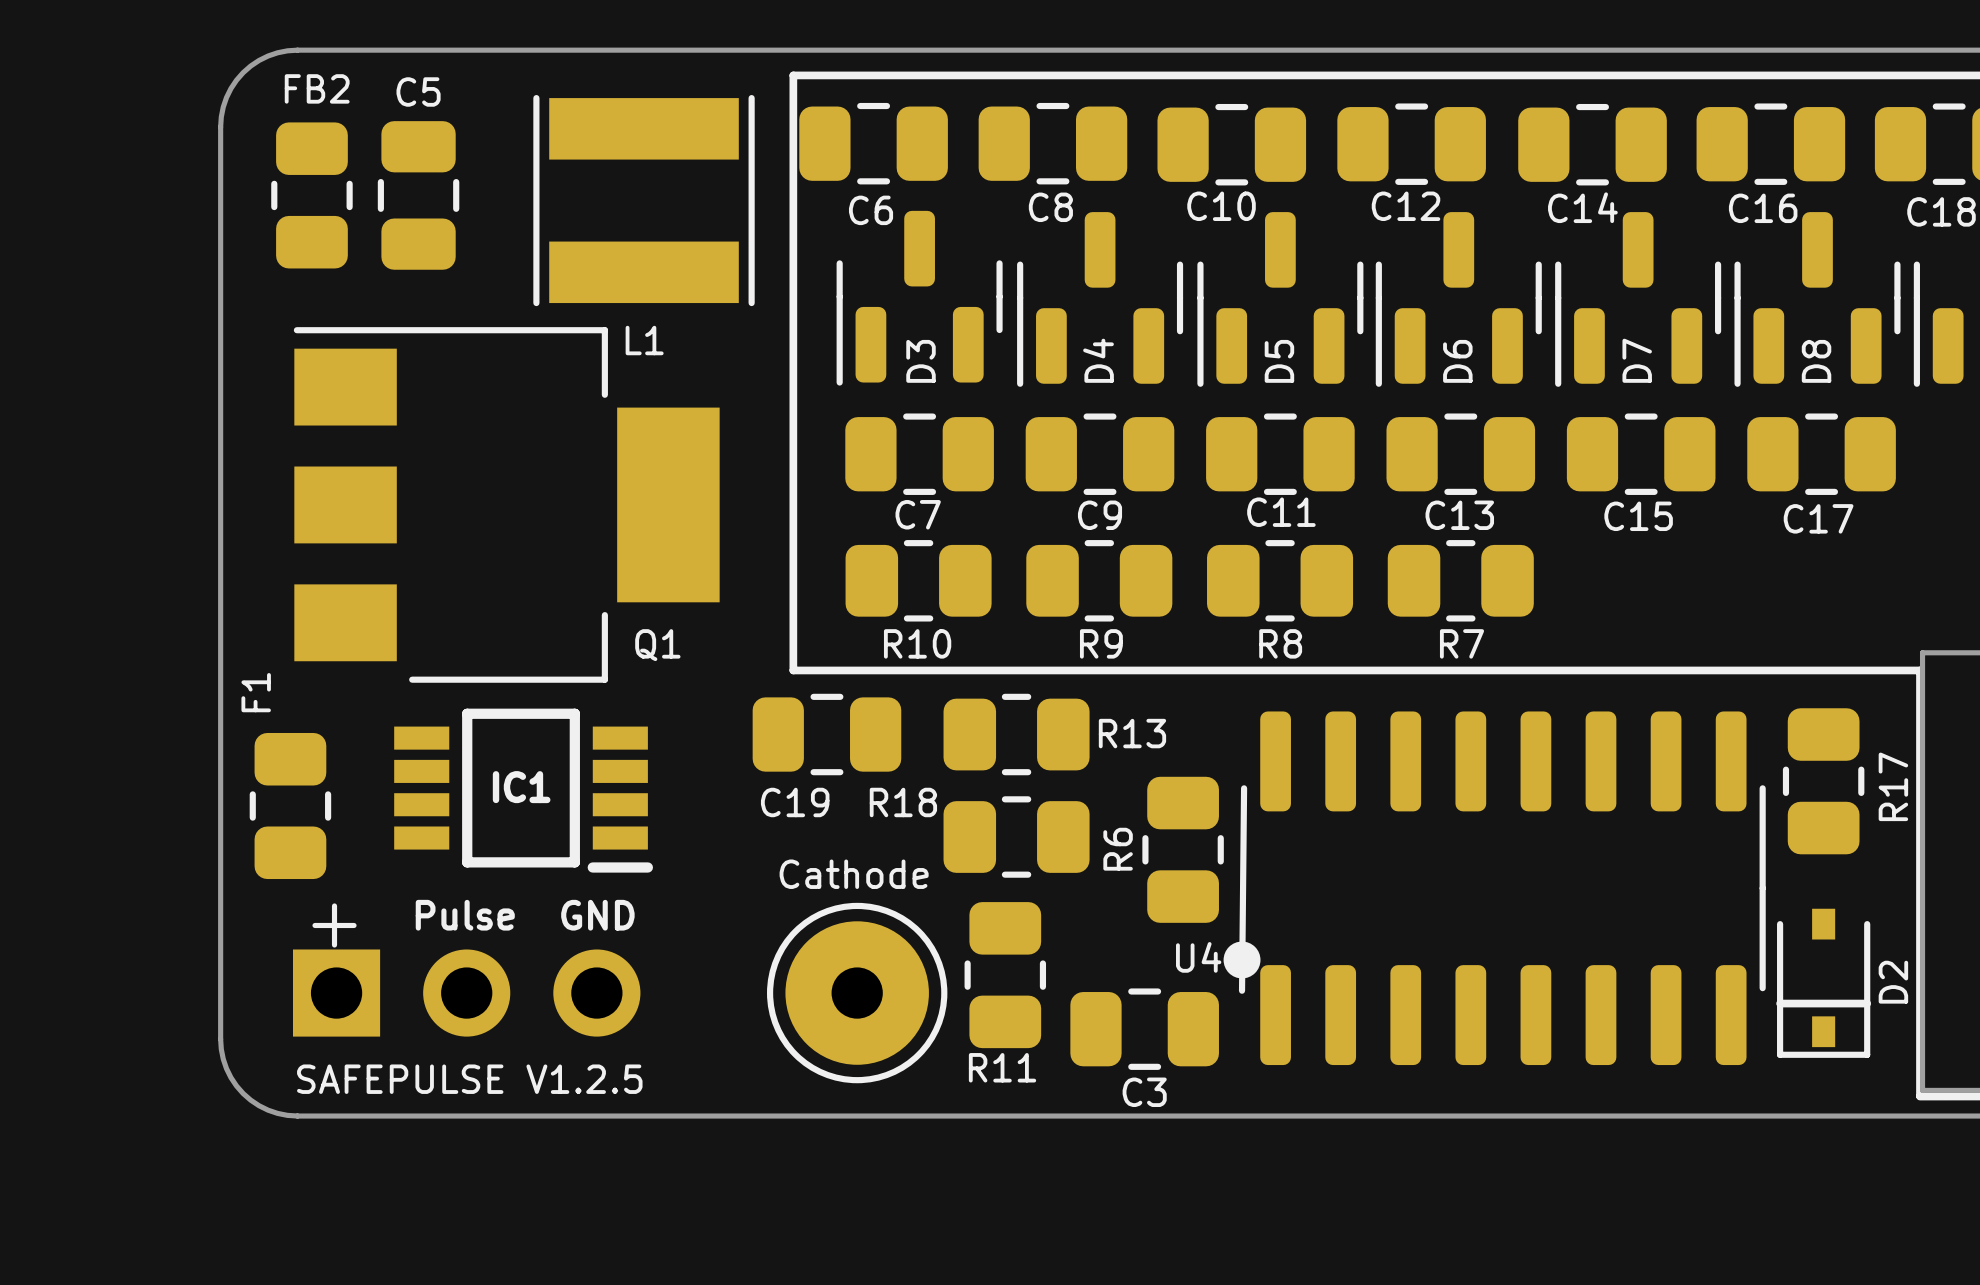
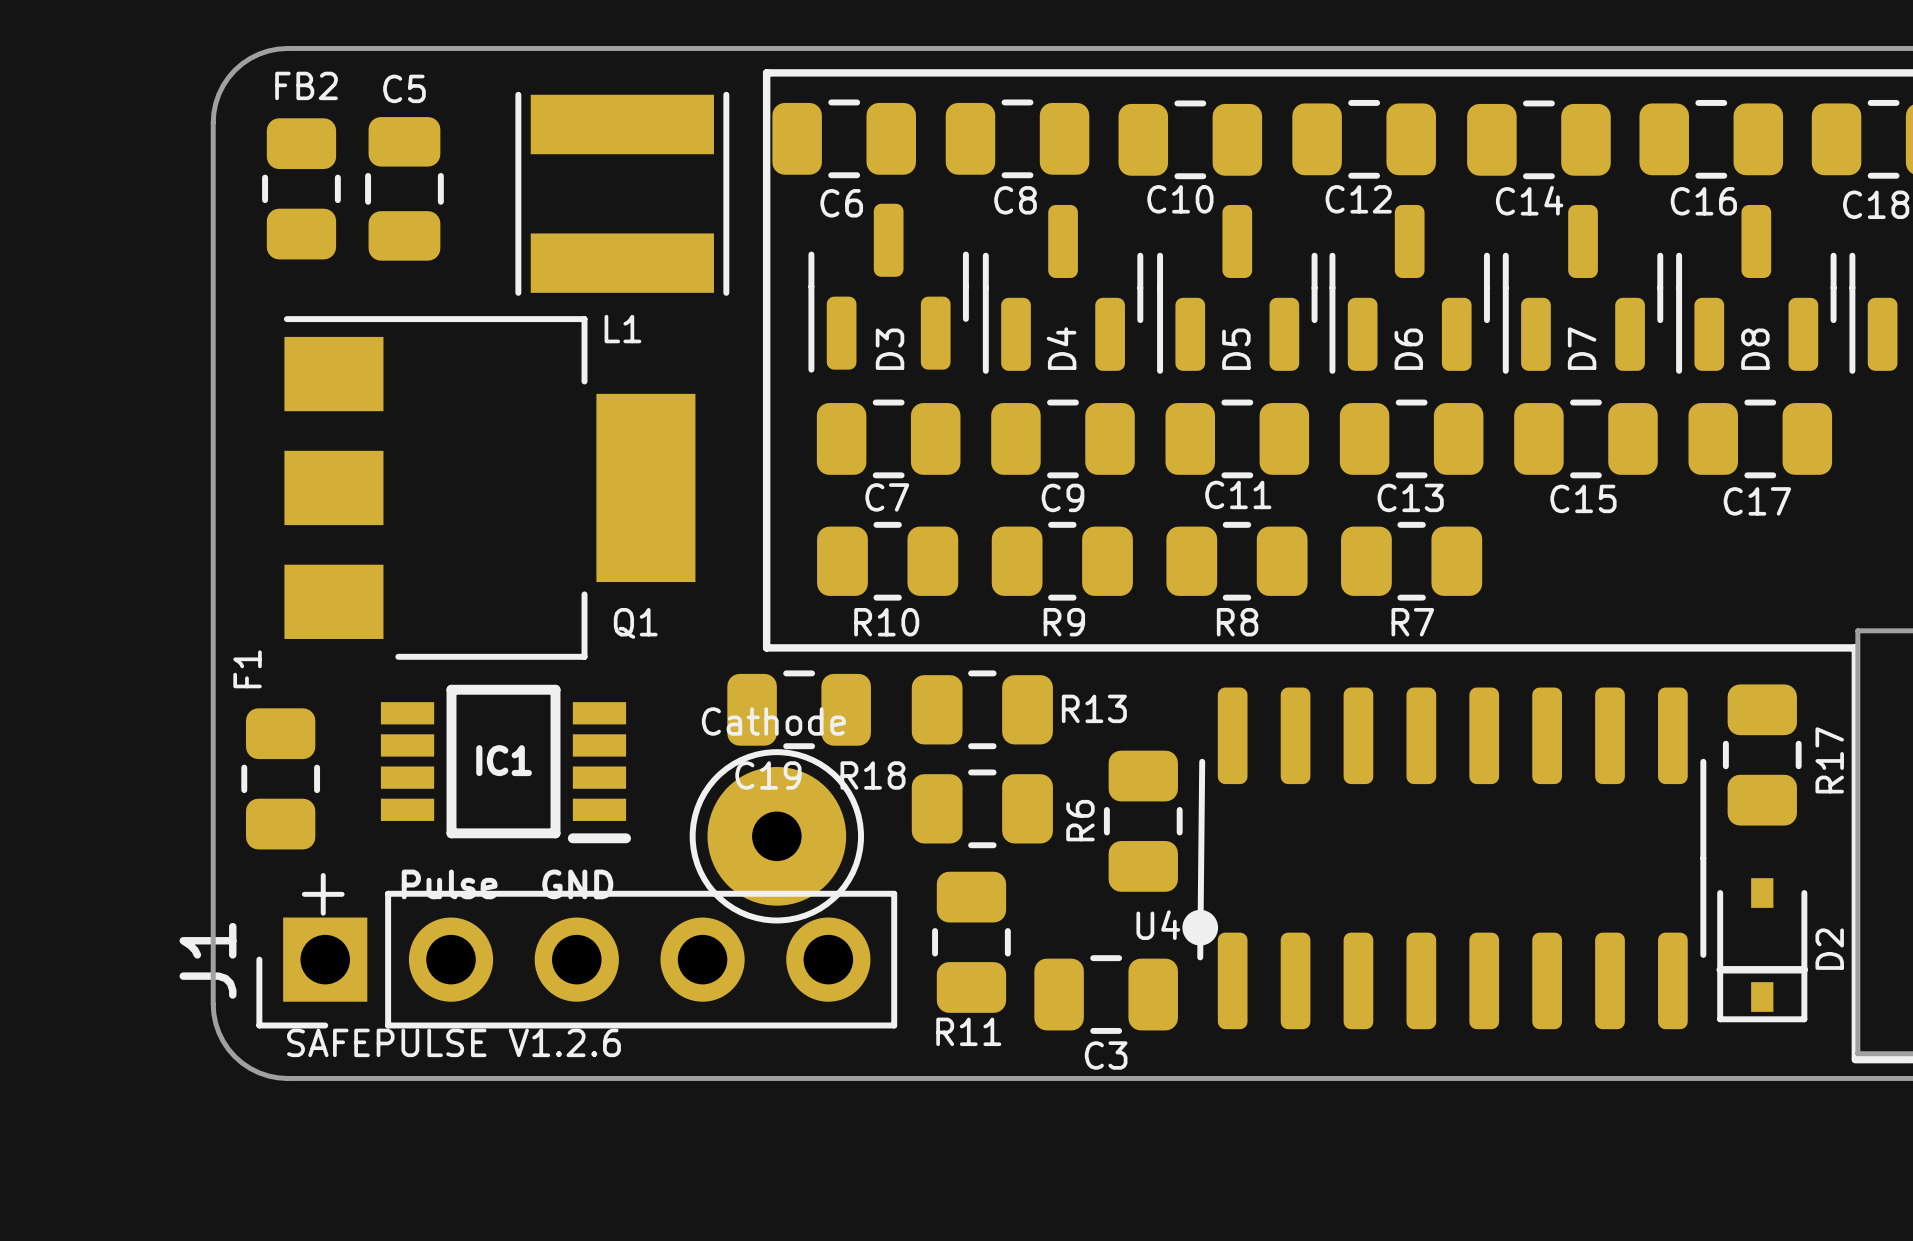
J1: none -> (576, 959)
part position: (857, 993) -> (776, 836)
text: SAFEPULSE V1.2.5 (469, 1079) -> SAFEPULSE V1.2.6 (453, 1042)

